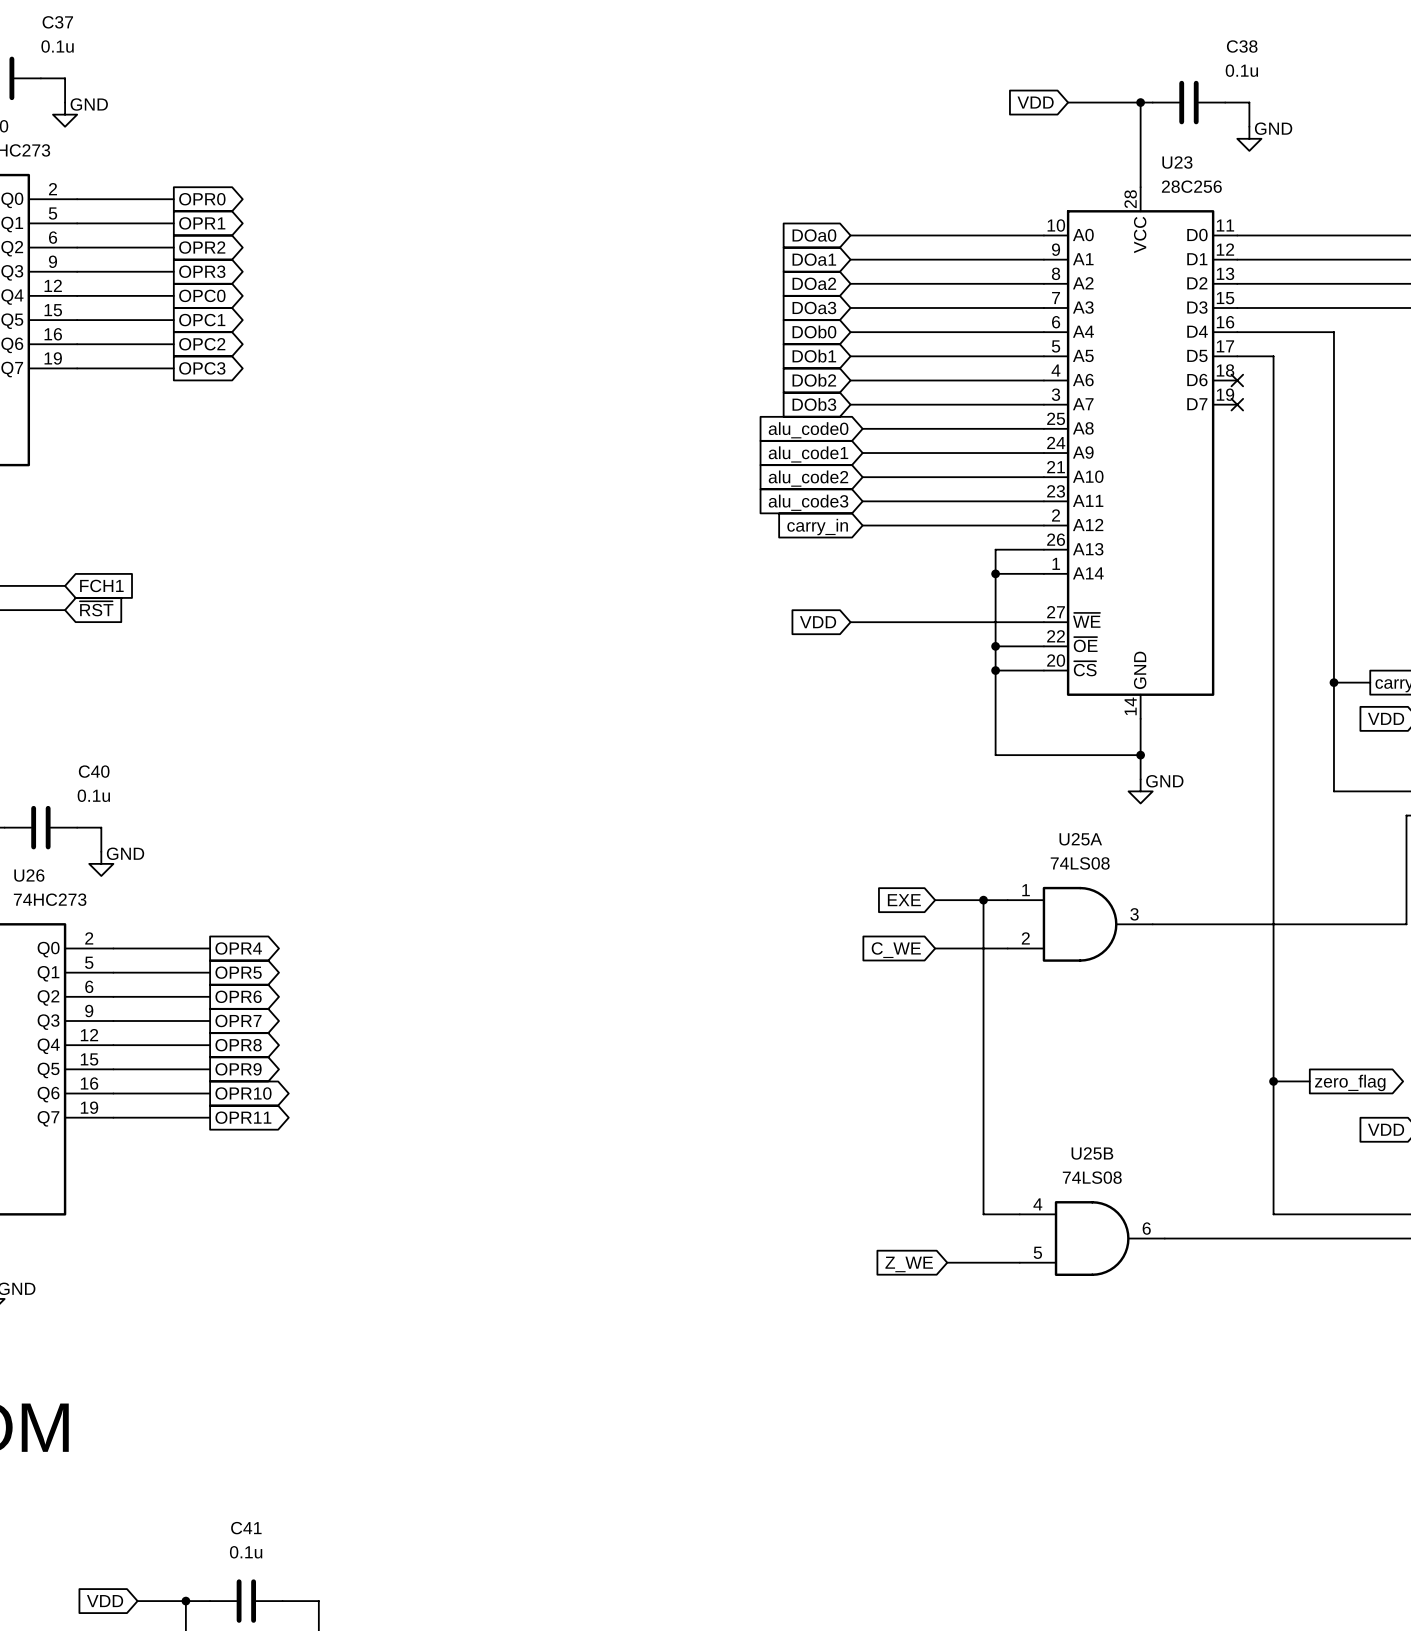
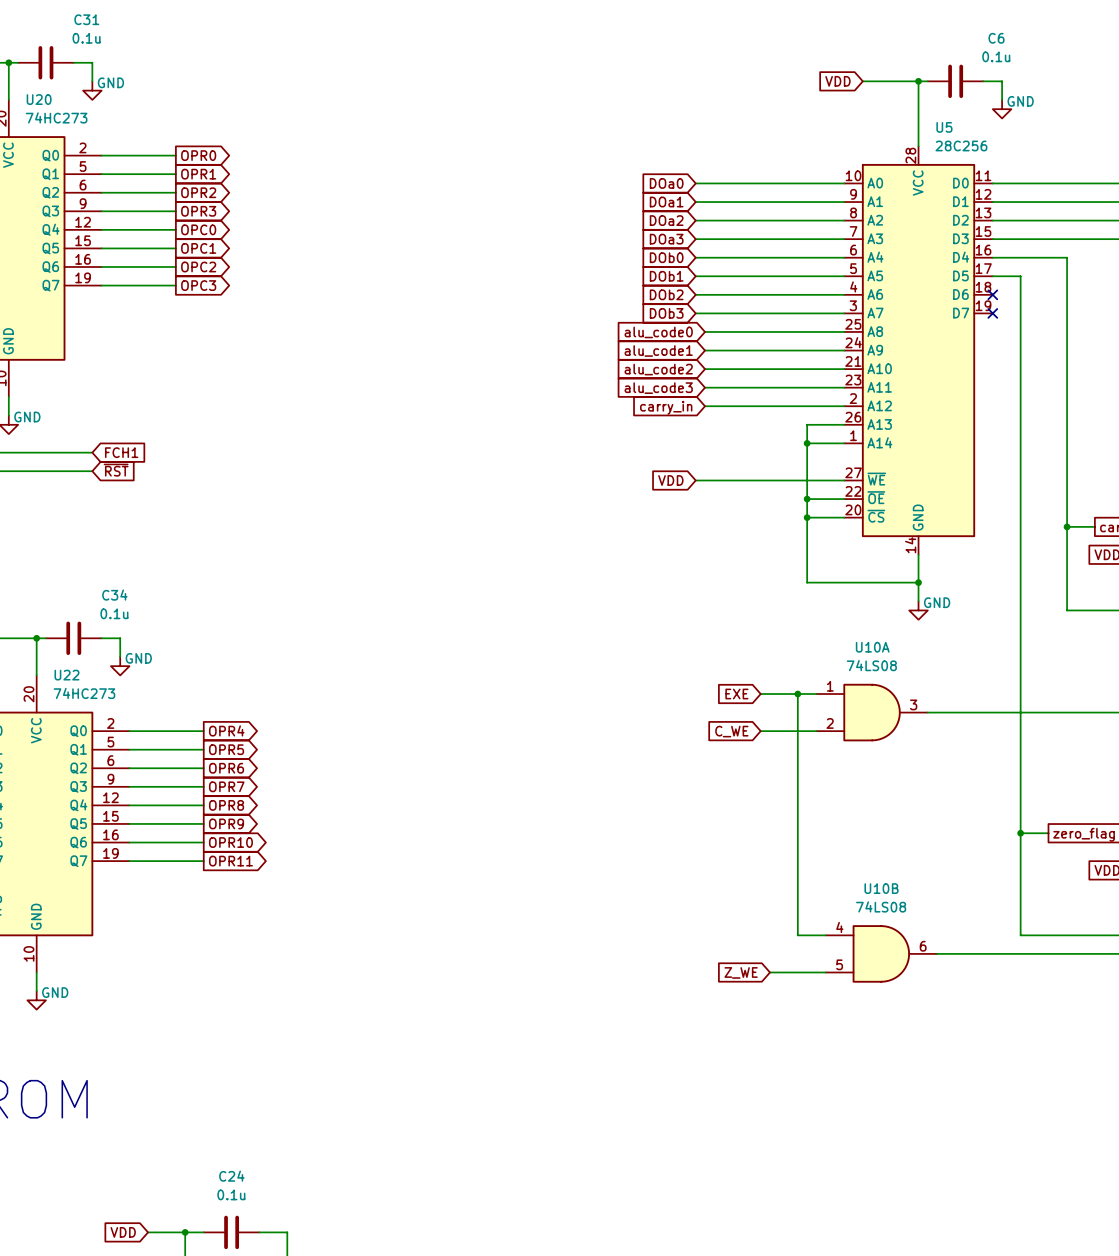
C37 name: C37 (57, 22) -> C31 (86, 19)
C38 name: C38 (1242, 46) -> C6 (996, 38)
U23 name: U23 (1177, 162) -> U5 (944, 127)
C40 name: C40 (94, 771) -> C34 (114, 595)
U25A name: U25A (1080, 839) -> U10A (872, 647)
U26 name: U26 (29, 875) -> U22 (66, 675)
U25B name: U25B (1092, 1153) -> U10B (881, 888)
C41 name: C41 (246, 1528) -> C24 (231, 1176)

